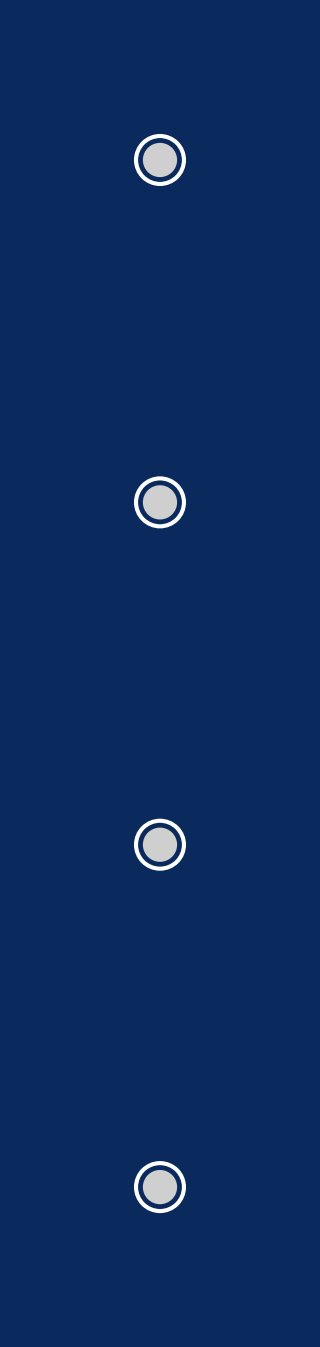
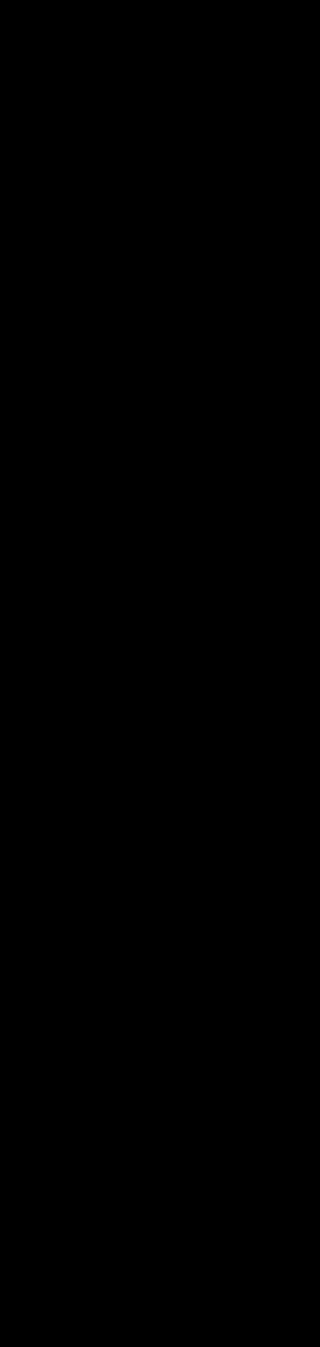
part: (159, 159) -> none
part: (159, 502) -> none
part: (159, 844) -> none
part: (159, 1187) -> none

